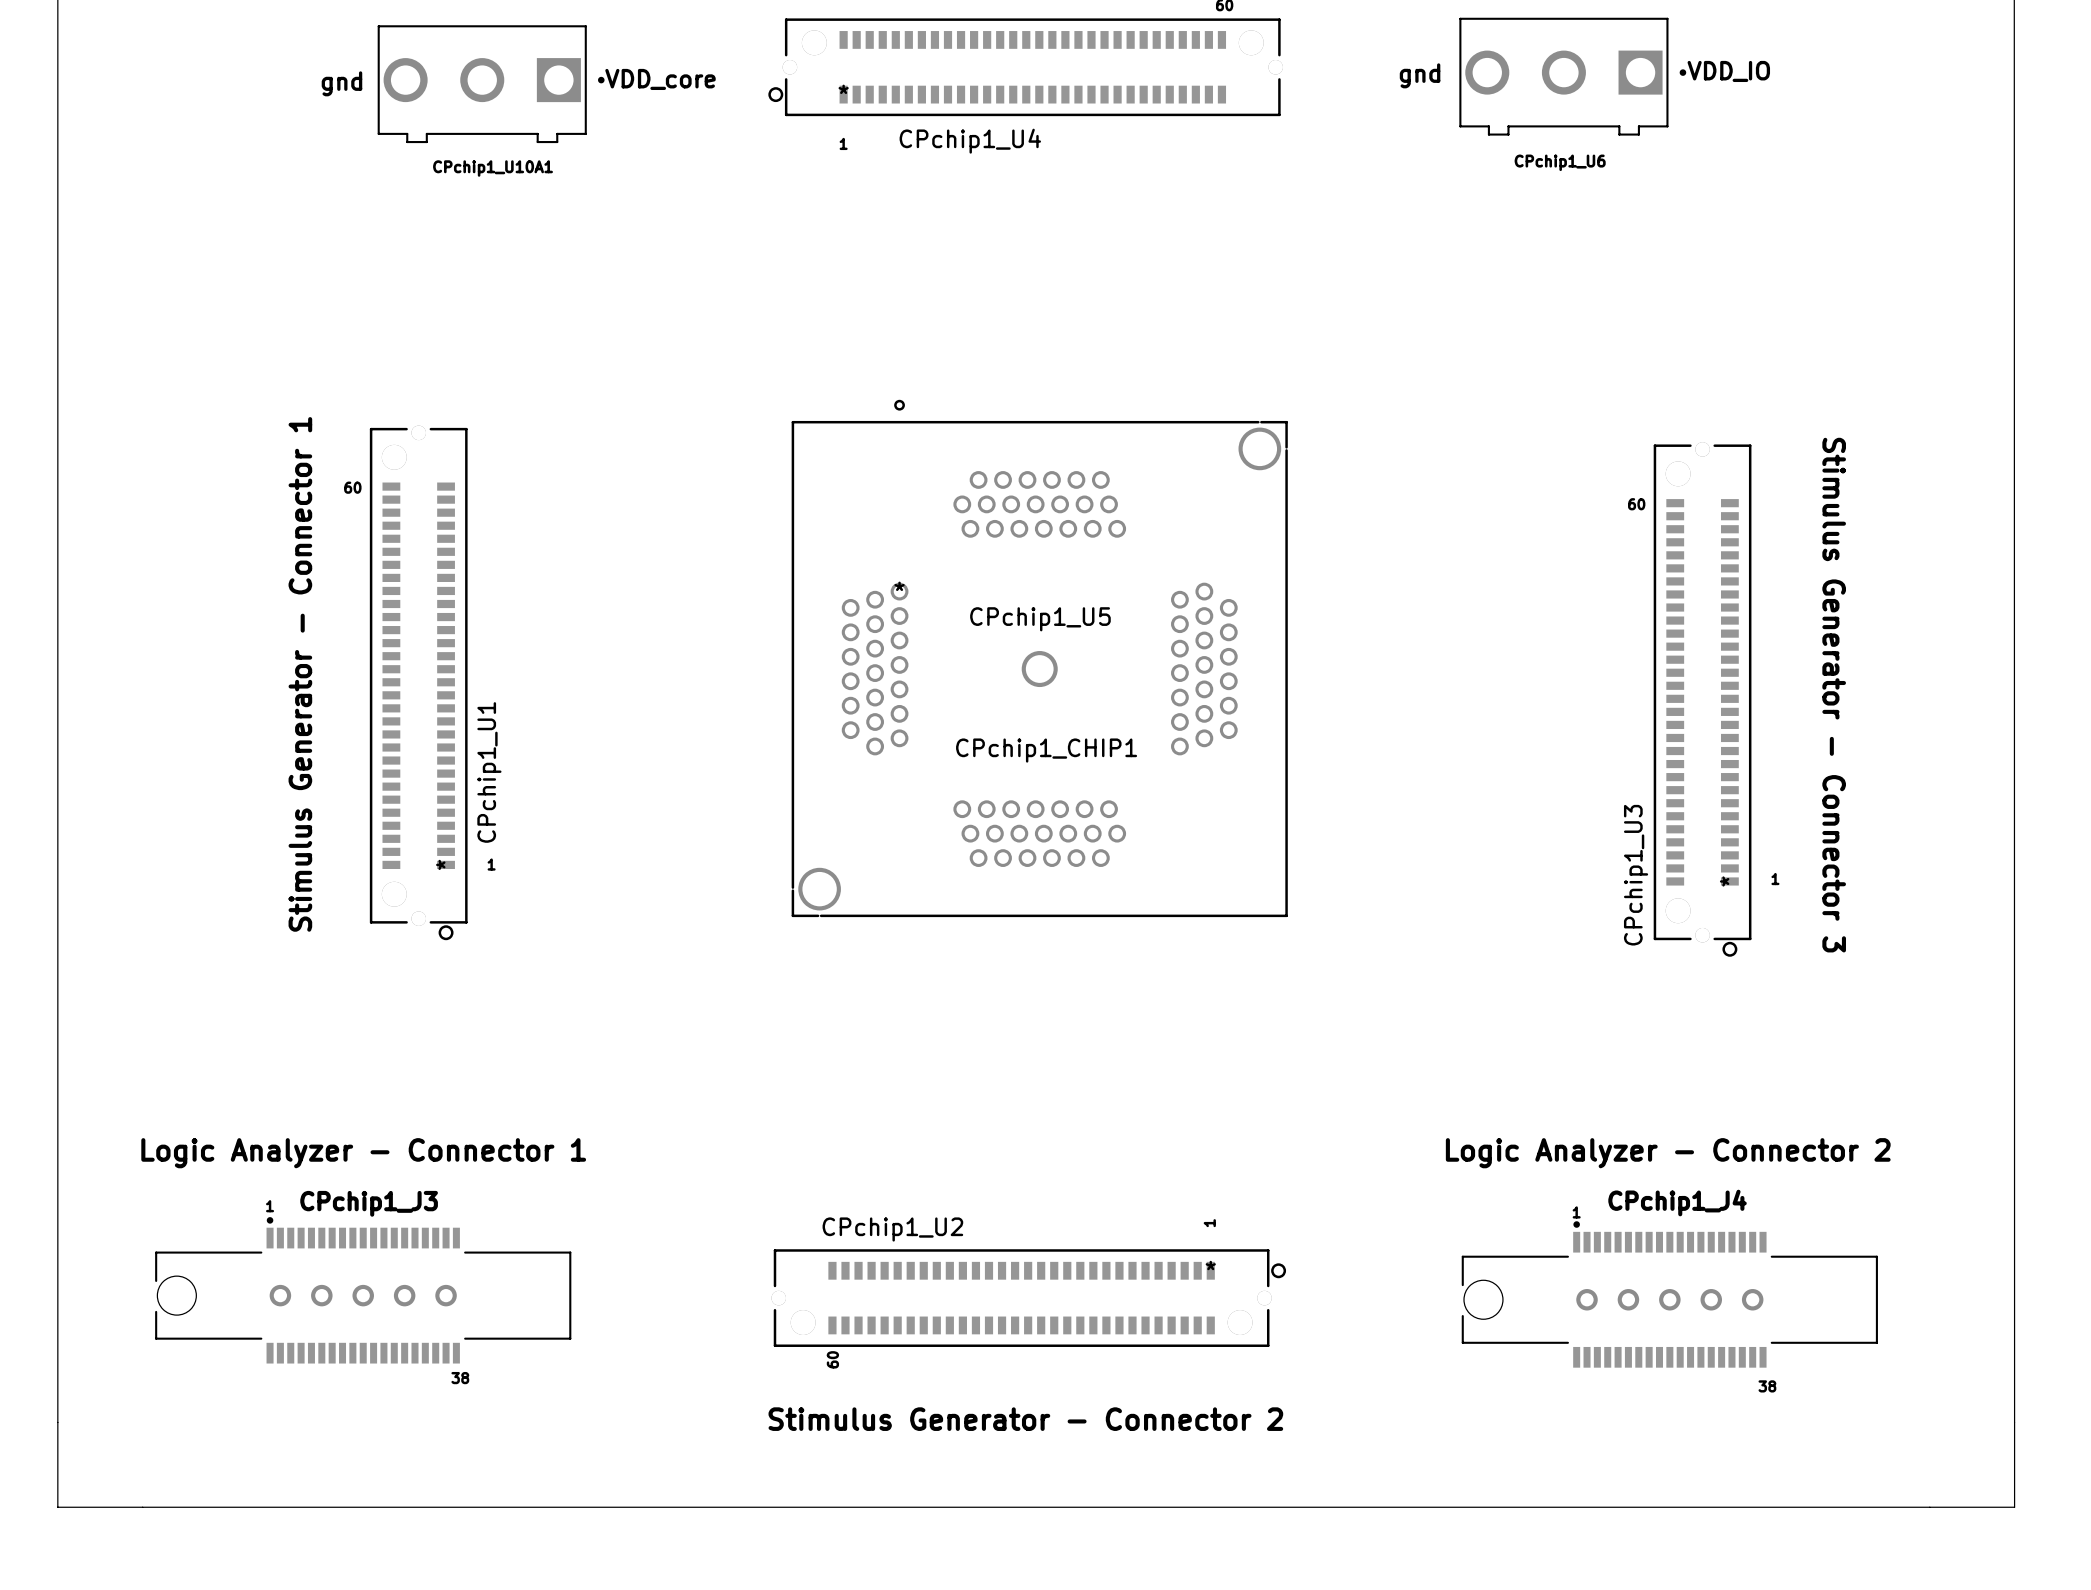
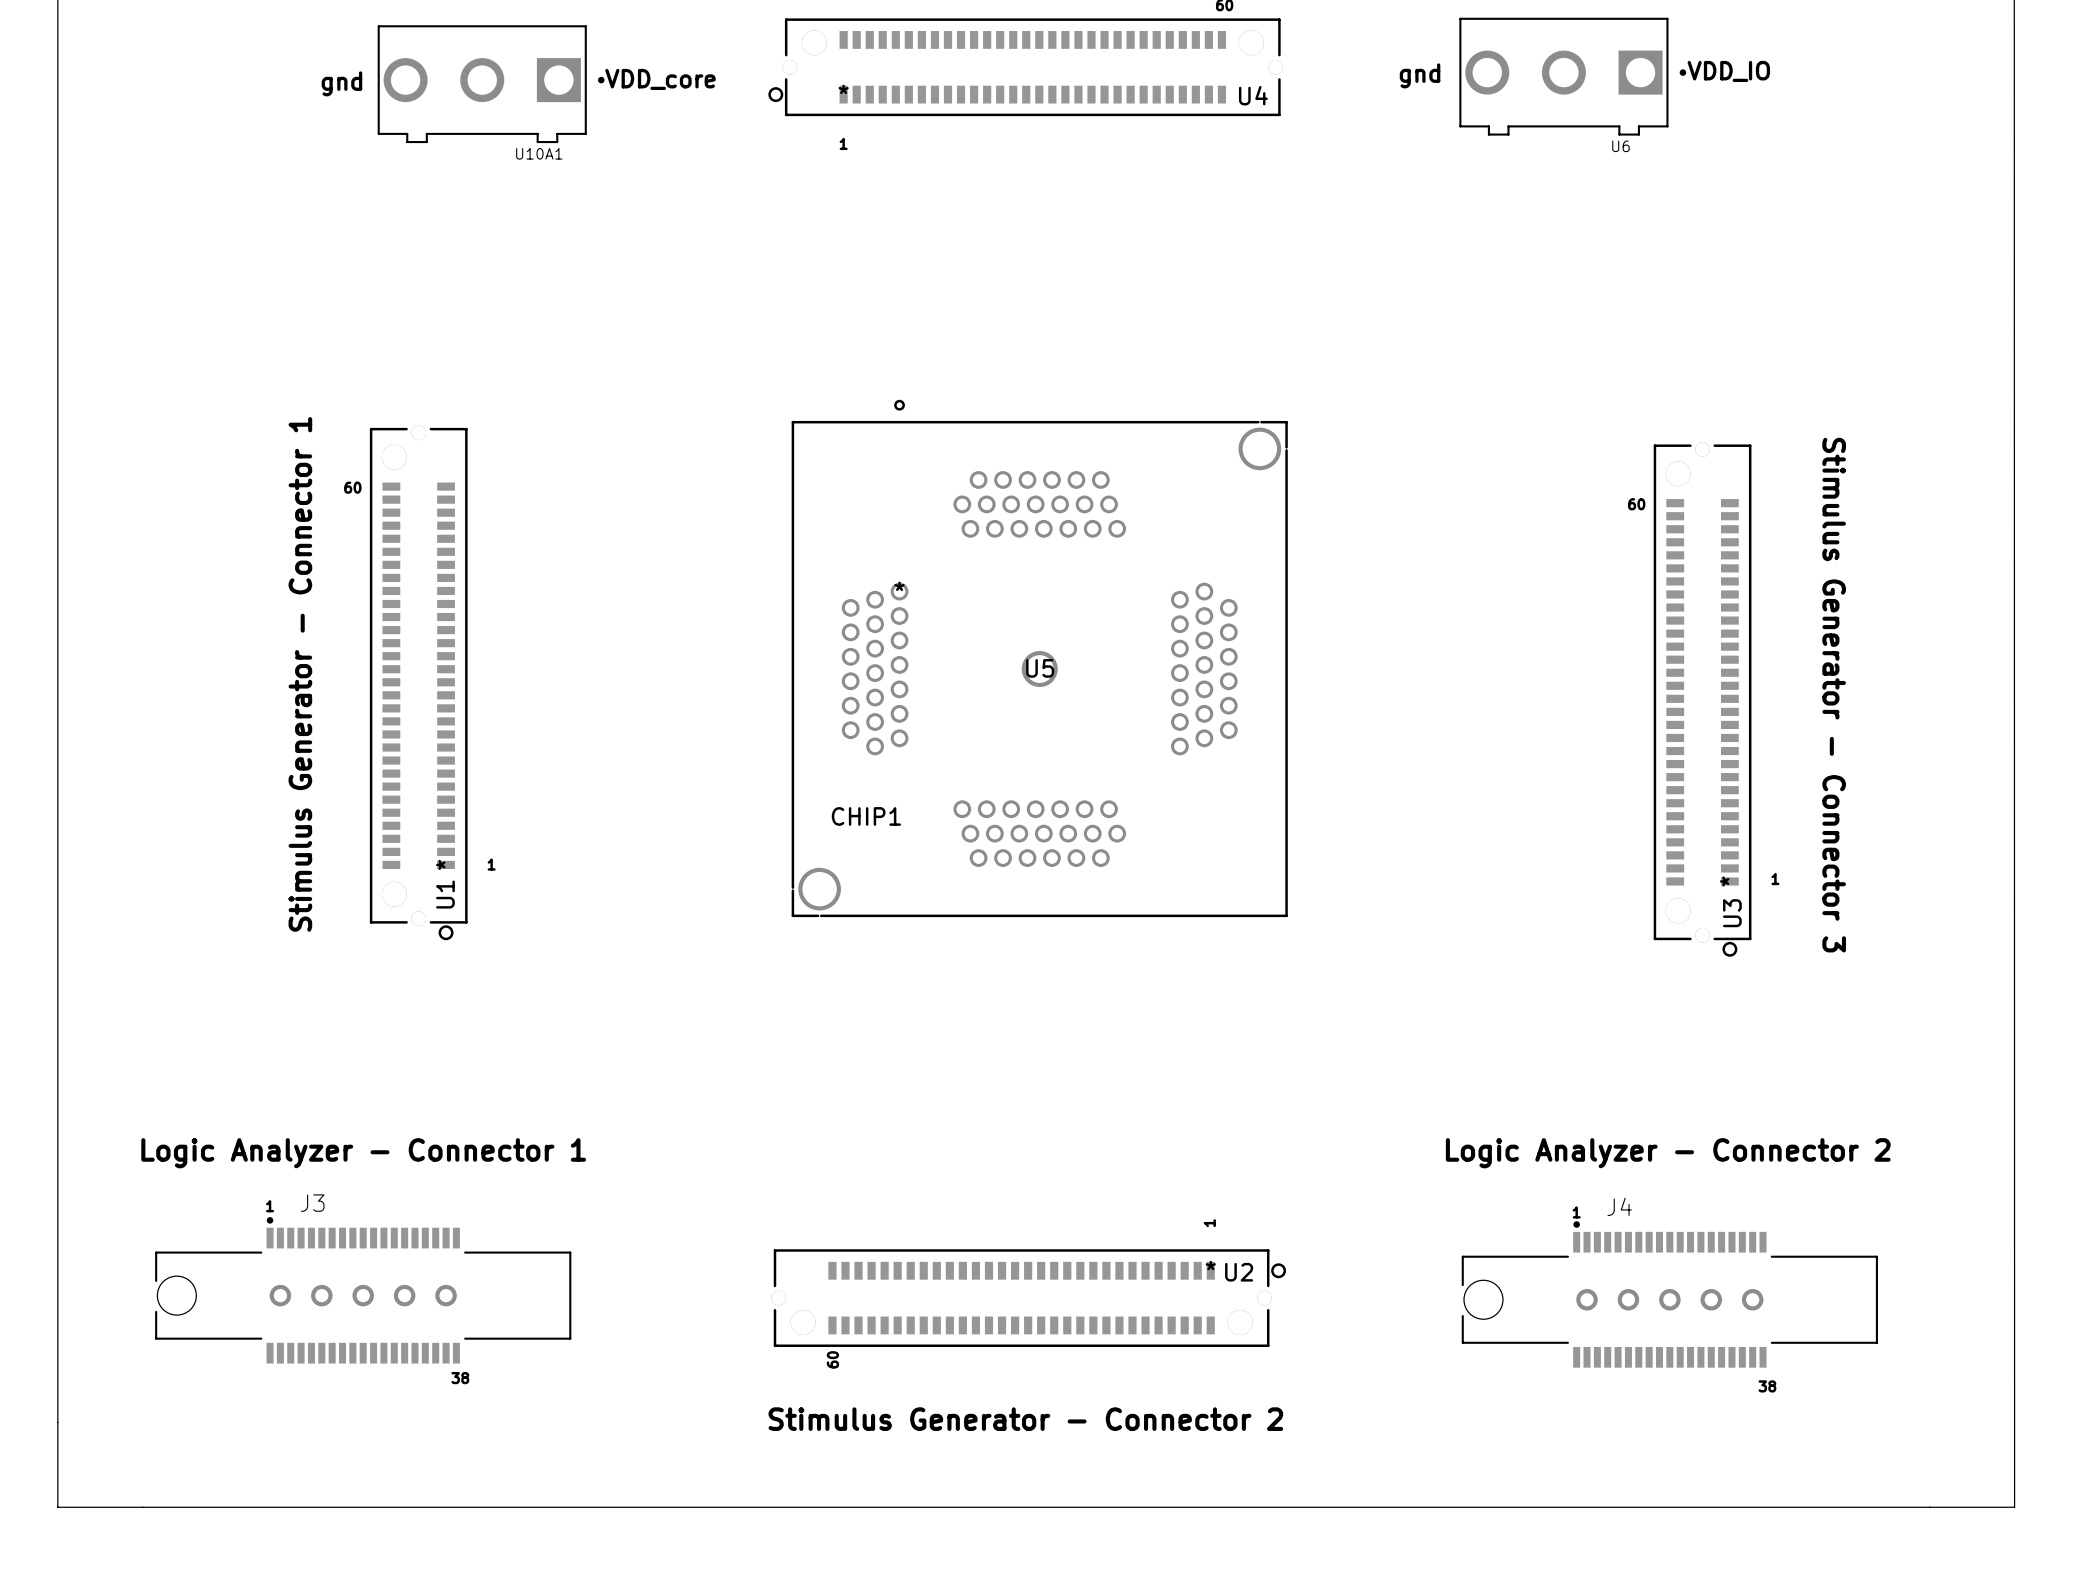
CPchip1_U4 name: CPchip1_U4 (970, 141) -> U4 (1253, 95)
CPchip1_U6 name: CPchip1_U6 (1560, 162) -> U6 (1620, 146)
CPchip1_U10A1 name: CPchip1_U10A1 (493, 168) -> U10A1 (539, 153)
CPchip1_U5 name: CPchip1_U5 (1040, 619) -> U5 (1040, 668)
CPchip1_U5 value: CPchip1_CHIP1 (1046, 750) -> CHIP1 (866, 816)
CPchip1_U1 name: CPchip1_U1 (489, 772) -> U1 (445, 894)
CPchip1_U3 name: CPchip1_U3 (1636, 875) -> U3 (1732, 913)
CPchip1_J3 name: CPchip1_J3 (369, 1203) -> J3 (312, 1203)
CPchip1_J4 name: CPchip1_J4 (1677, 1203) -> J4 (1619, 1206)
CPchip1_U2 name: CPchip1_U2 (892, 1229) -> U2 (1239, 1272)

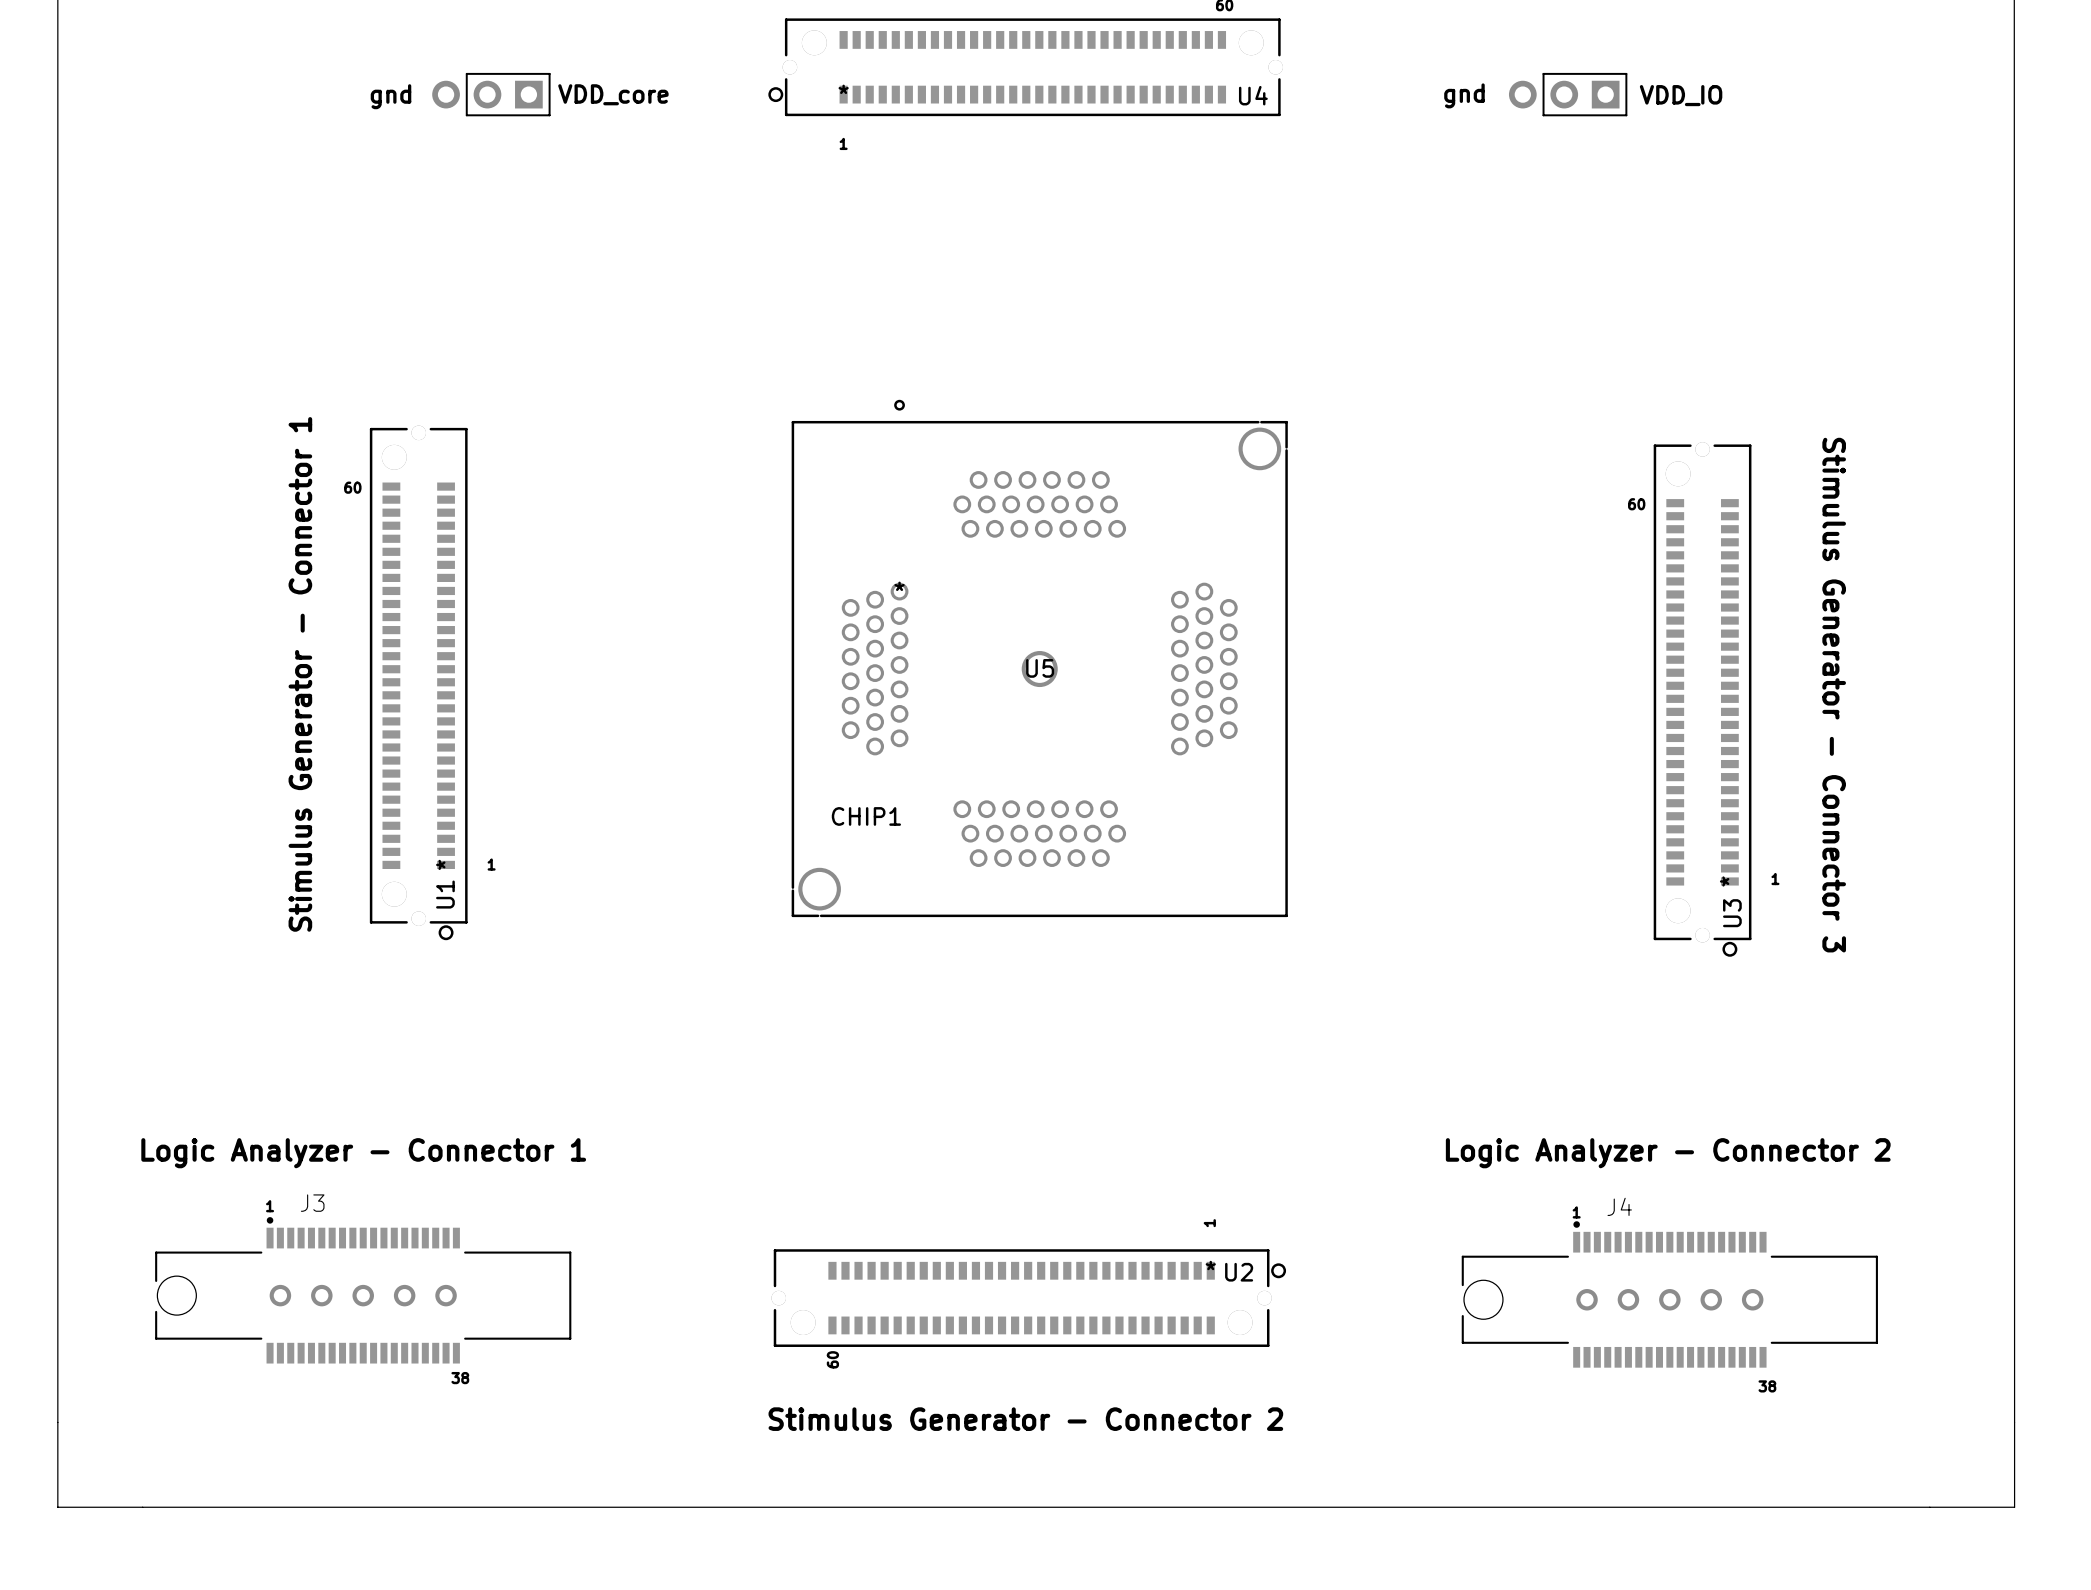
text position: VDD_IO (1728, 71) -> VDD_IO (1681, 95)
line: none -> (466, 73) (549, 73) (549, 115) (466, 115) (466, 73)
line: none -> (1543, 73) (1626, 73) (1626, 115) (1543, 115) (1543, 73)
text position: gnd (1420, 75) -> gnd (1464, 95)
U6: (1572, 76) -> none
text position: VDD_core (660, 79) -> VDD_core (613, 94)
text position: gnd (341, 83) -> gnd (391, 96)
U10A1: (491, 84) -> none
part: none -> (487, 94)
part: none -> (1564, 94)

